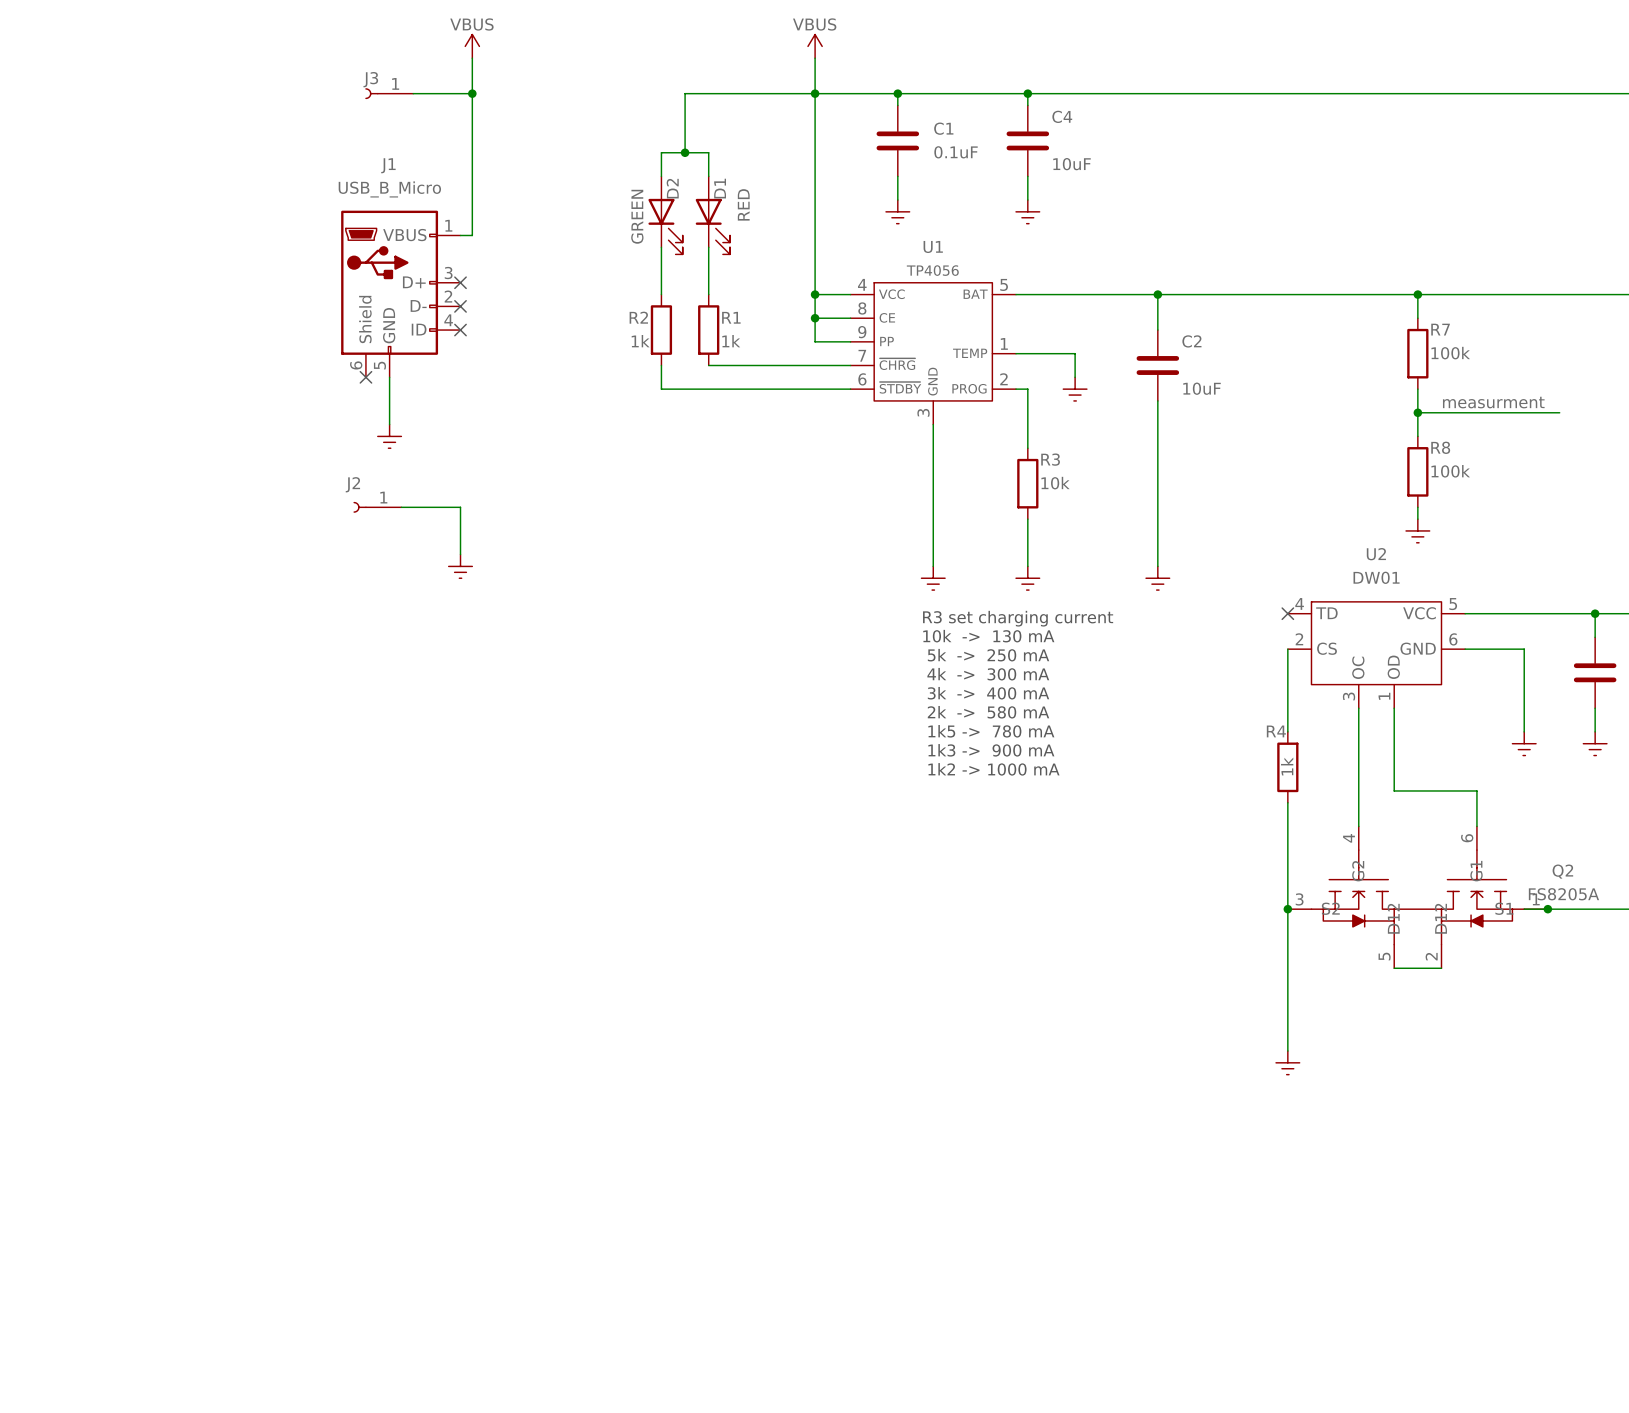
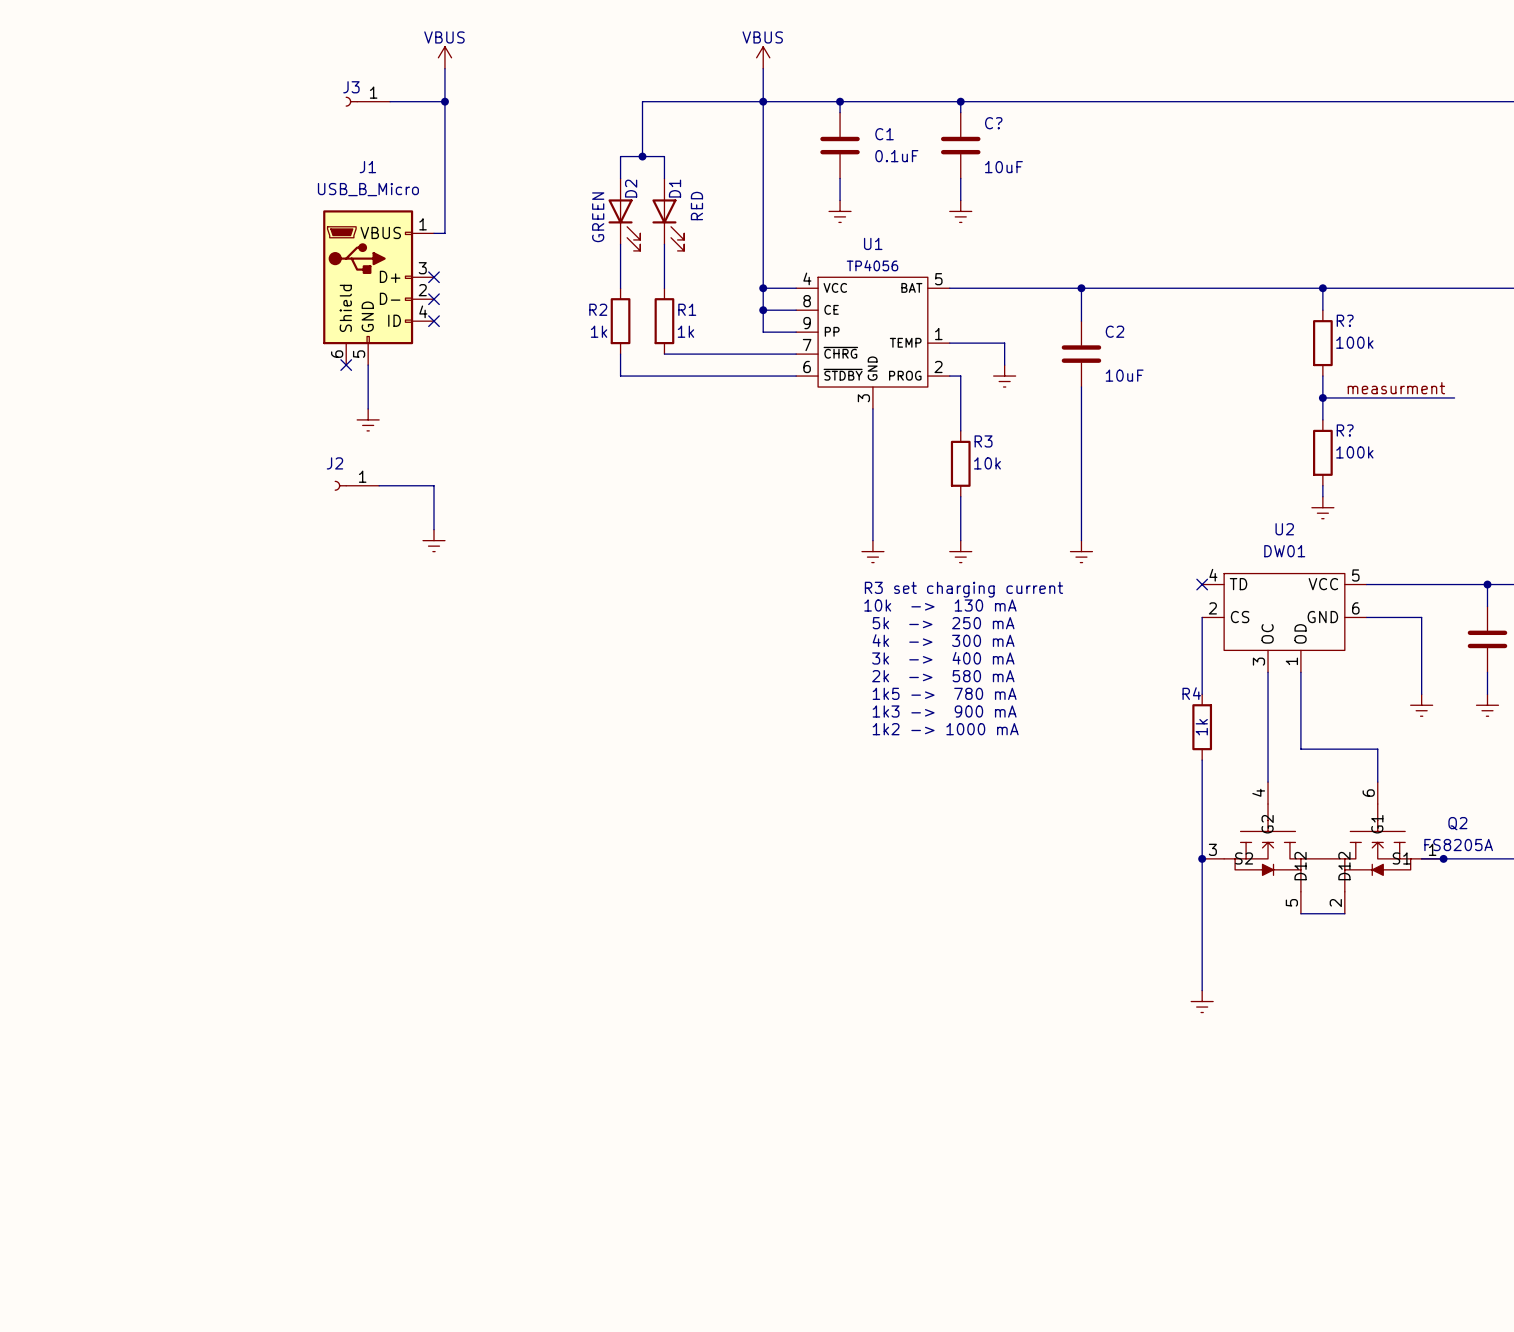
C4 name: C4 (1062, 116) -> C? (993, 123)
R7 name: R7 (1440, 329) -> R? (1345, 320)
R8 name: R8 (1440, 447) -> R? (1345, 430)

